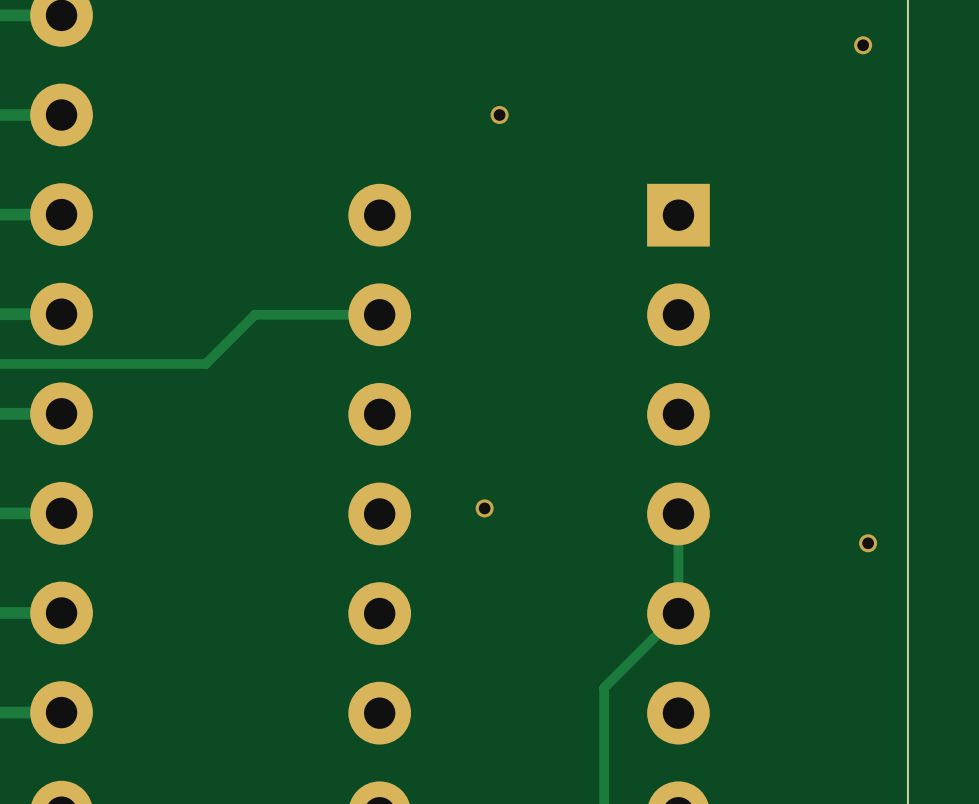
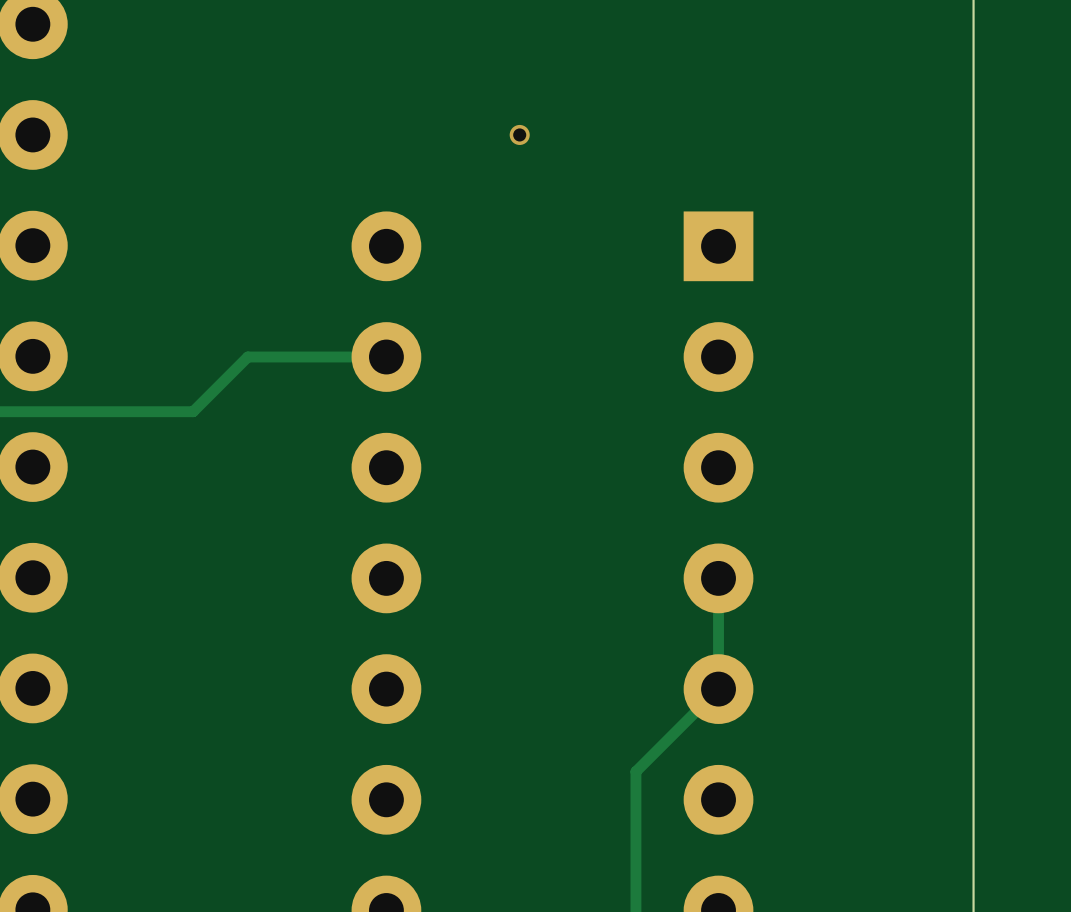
via: (863, 45) -> none
via: (484, 508) -> none
via: (868, 543) -> none

